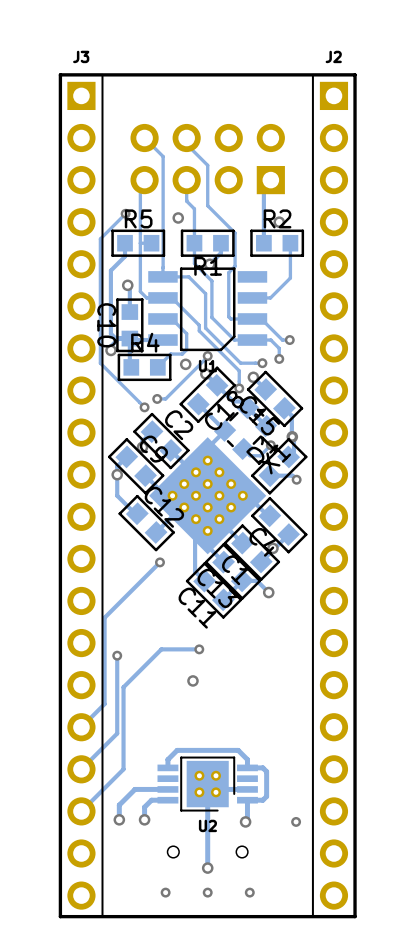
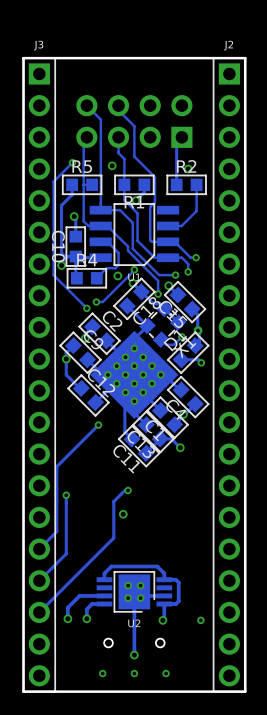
track: (199, 649) (161, 649) (123, 687) (123, 769) -> (124, 490) (113, 501) (113, 538) (71, 580)

